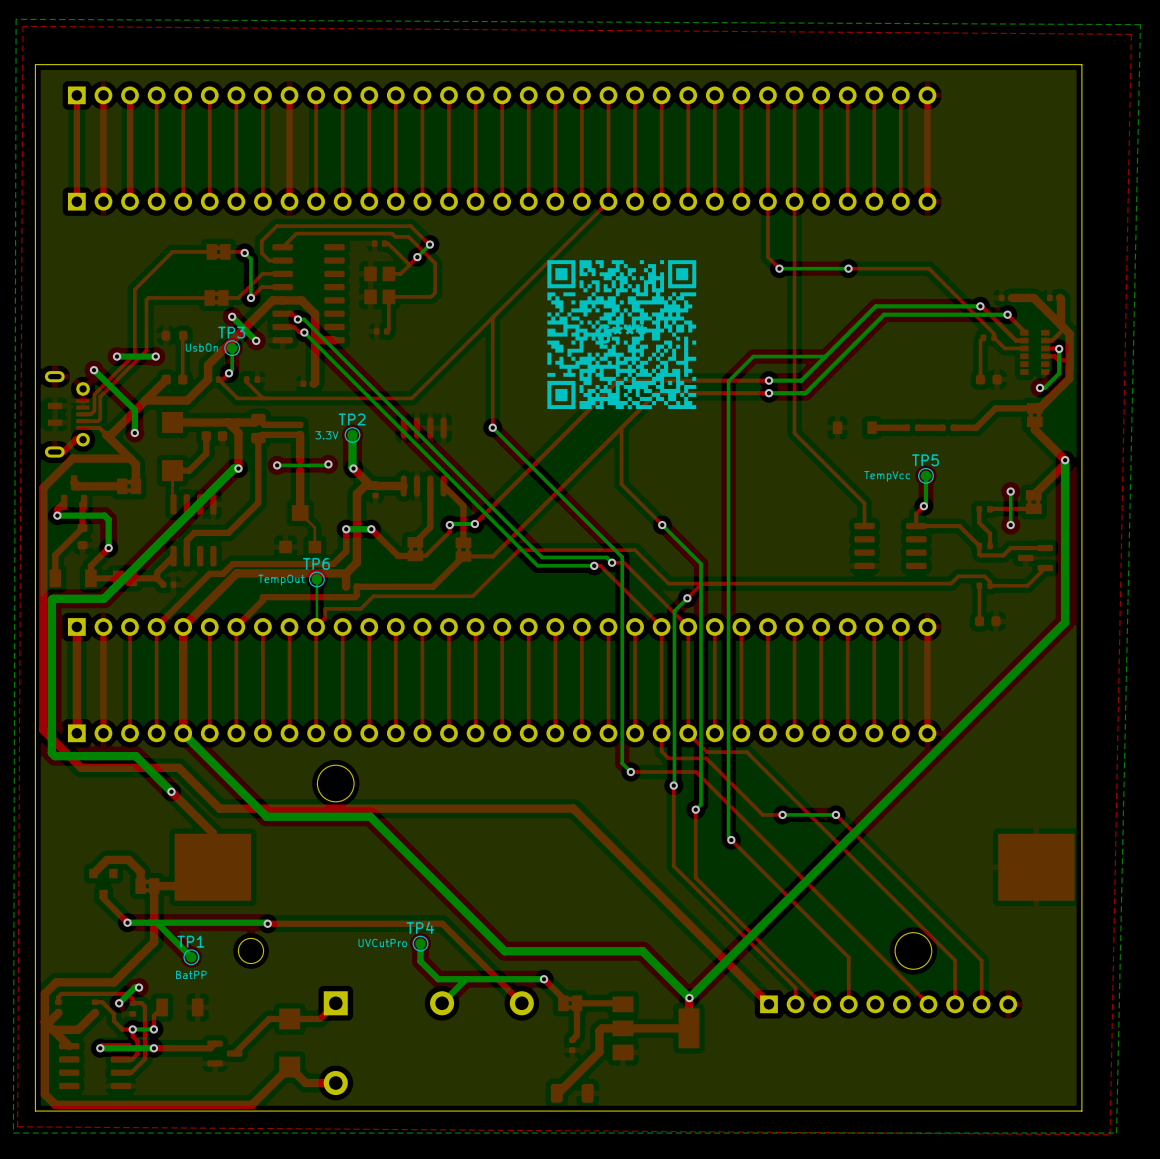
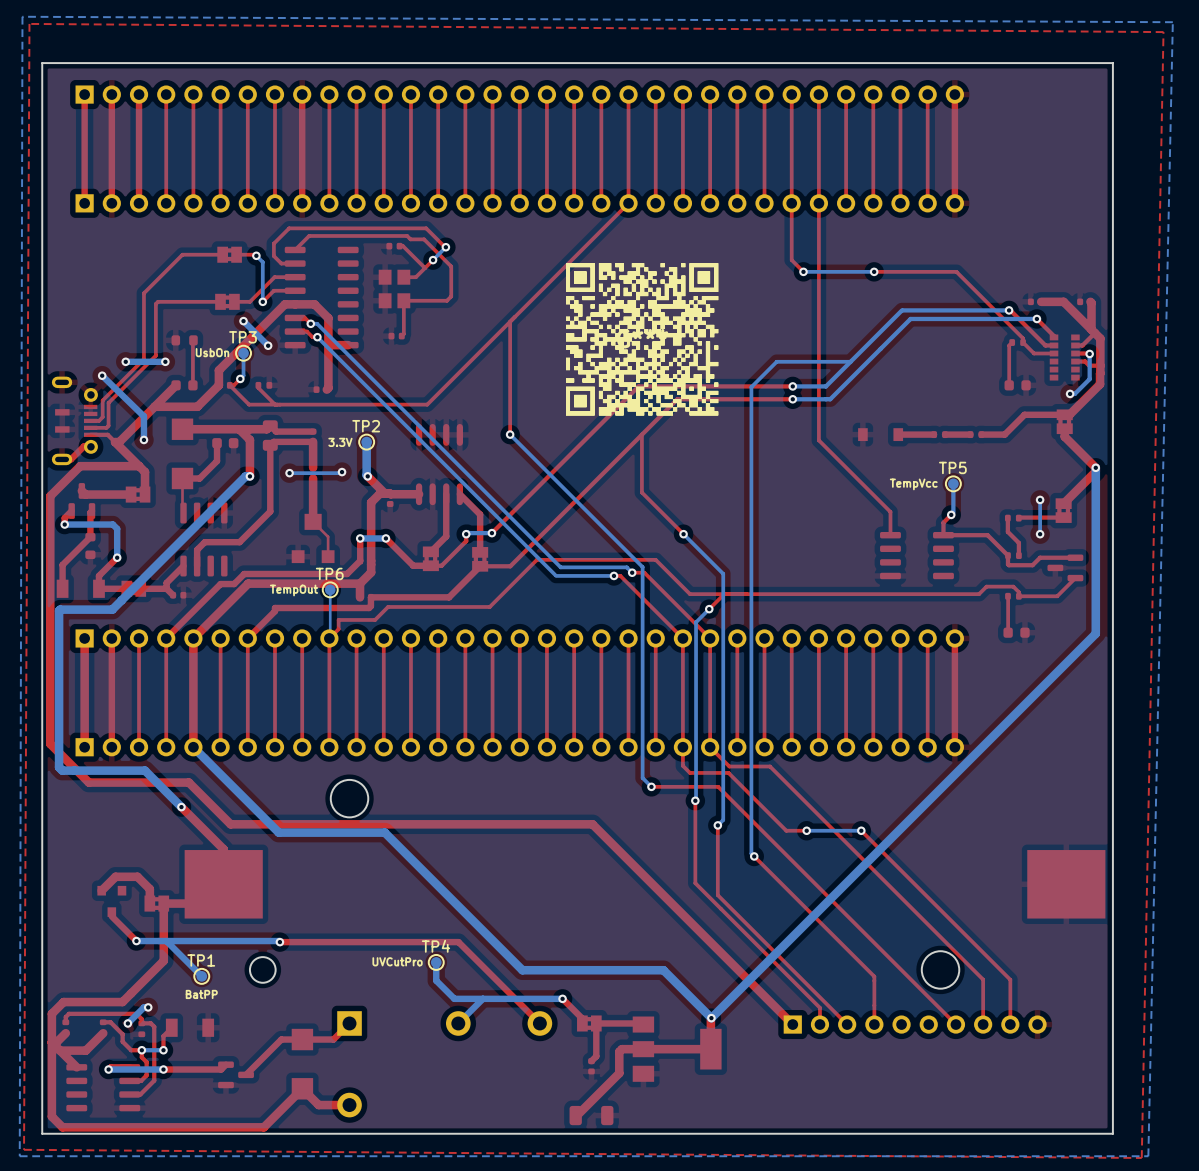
drawing: none -> [566, 263, 719, 416]

